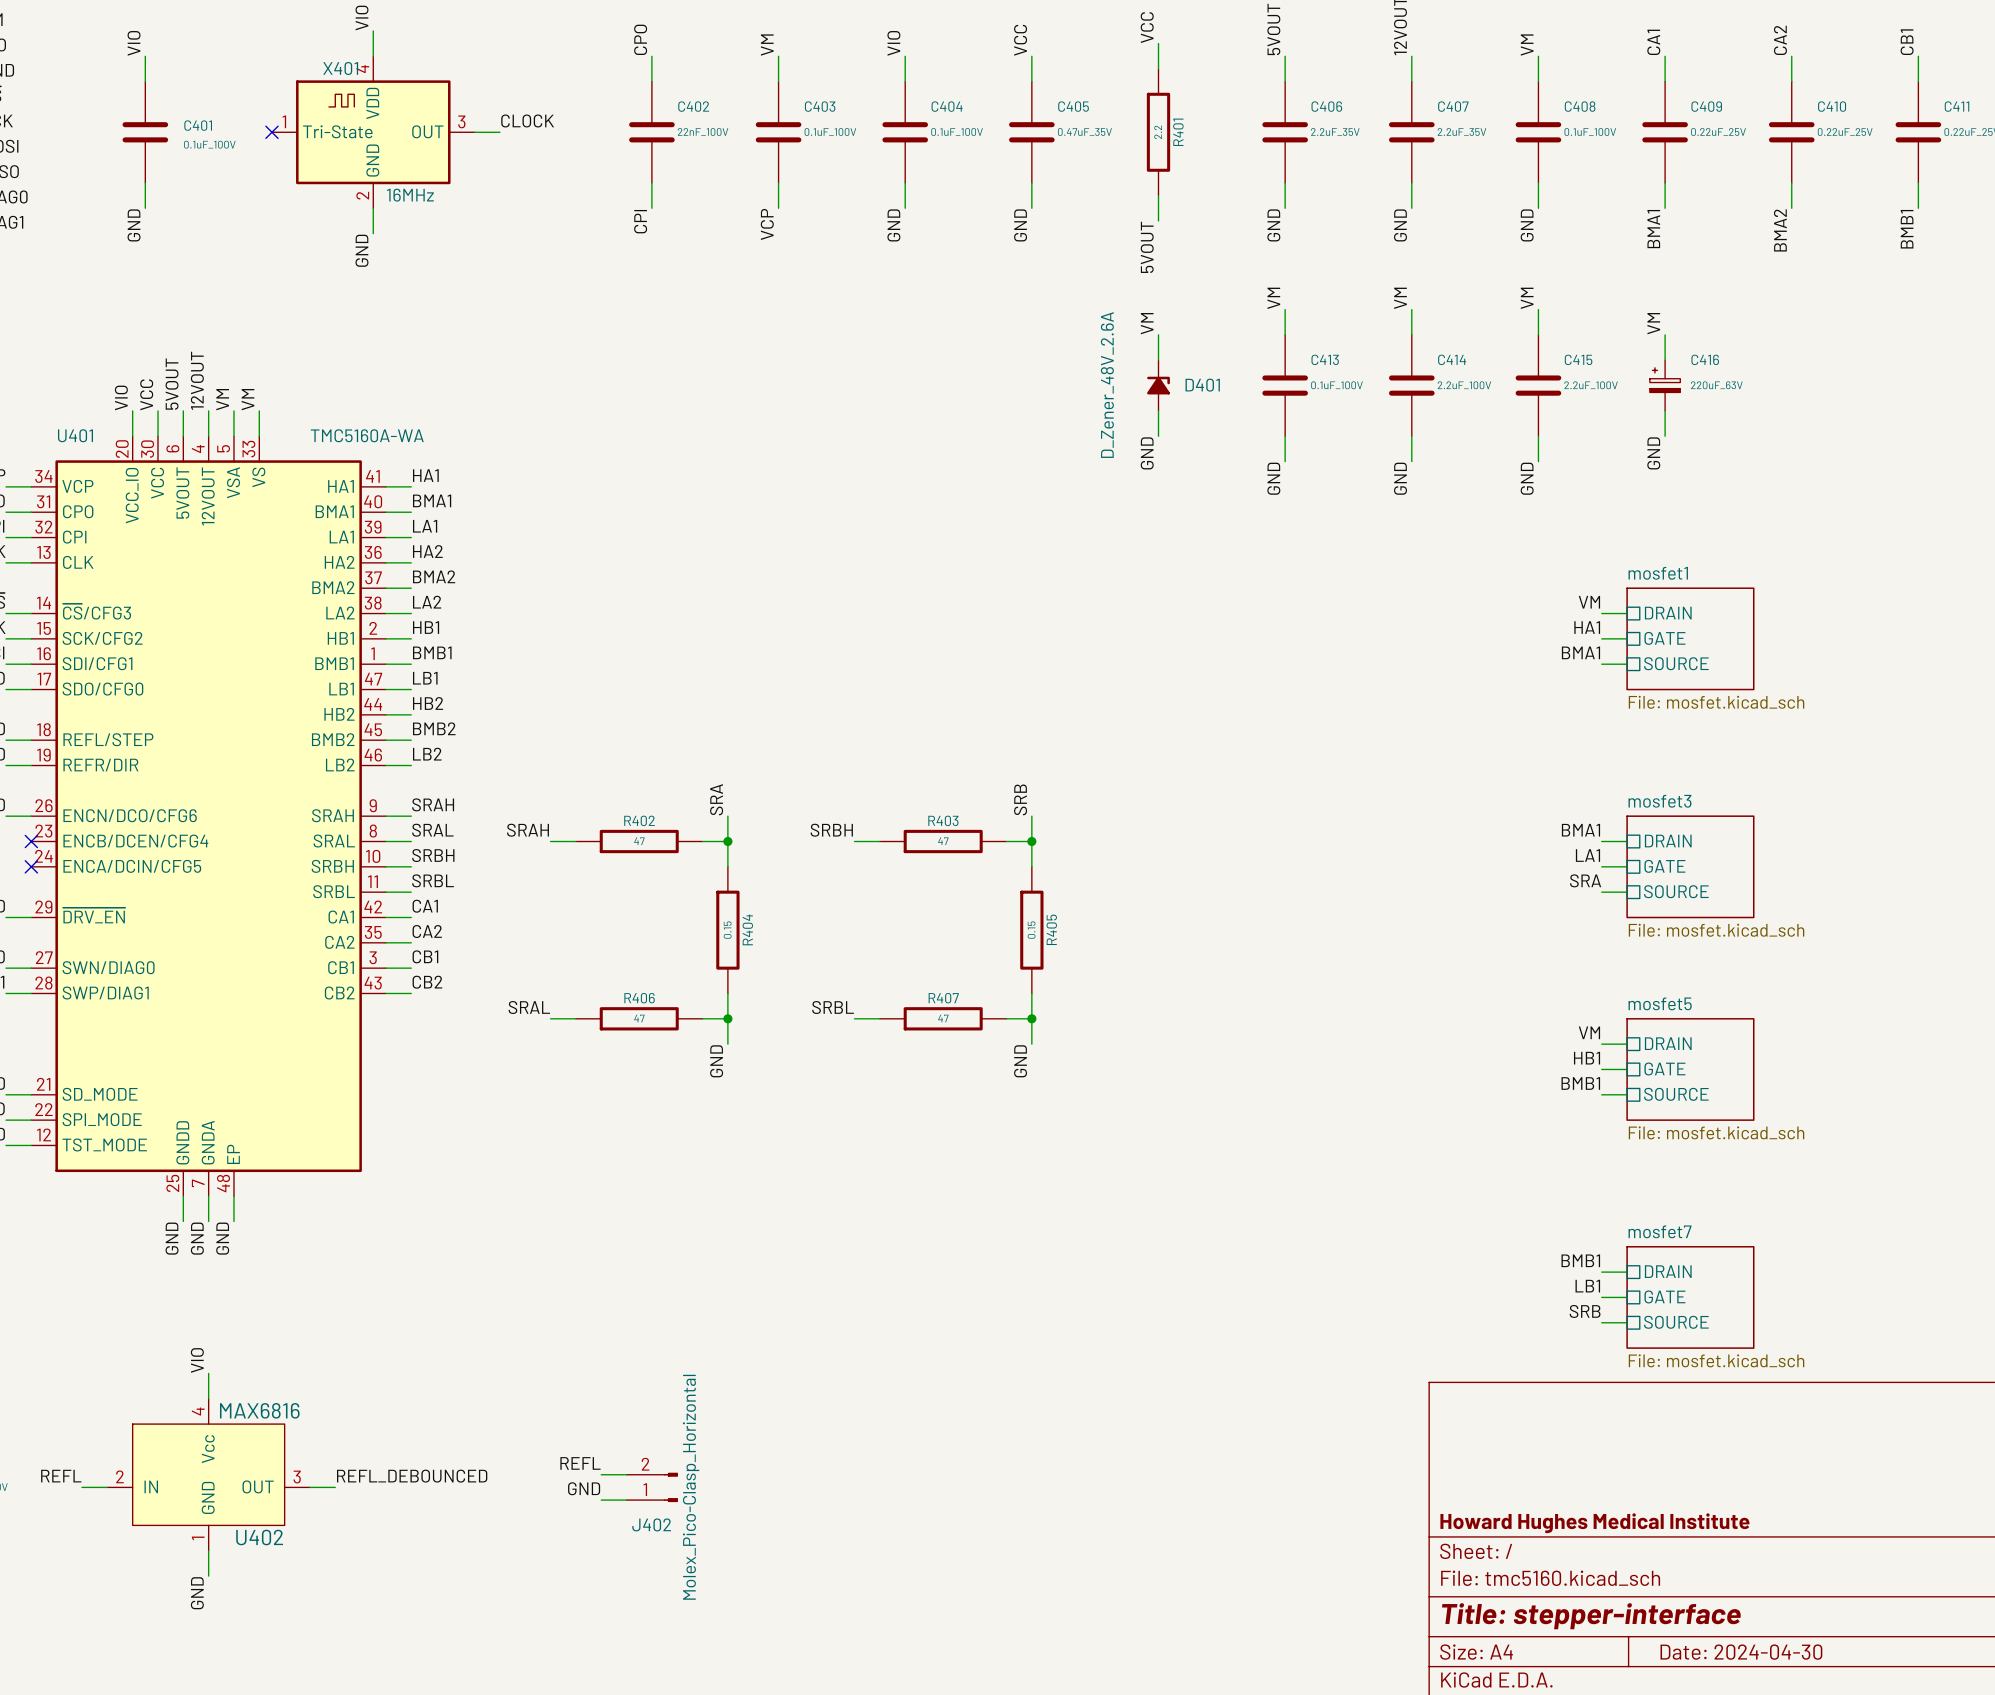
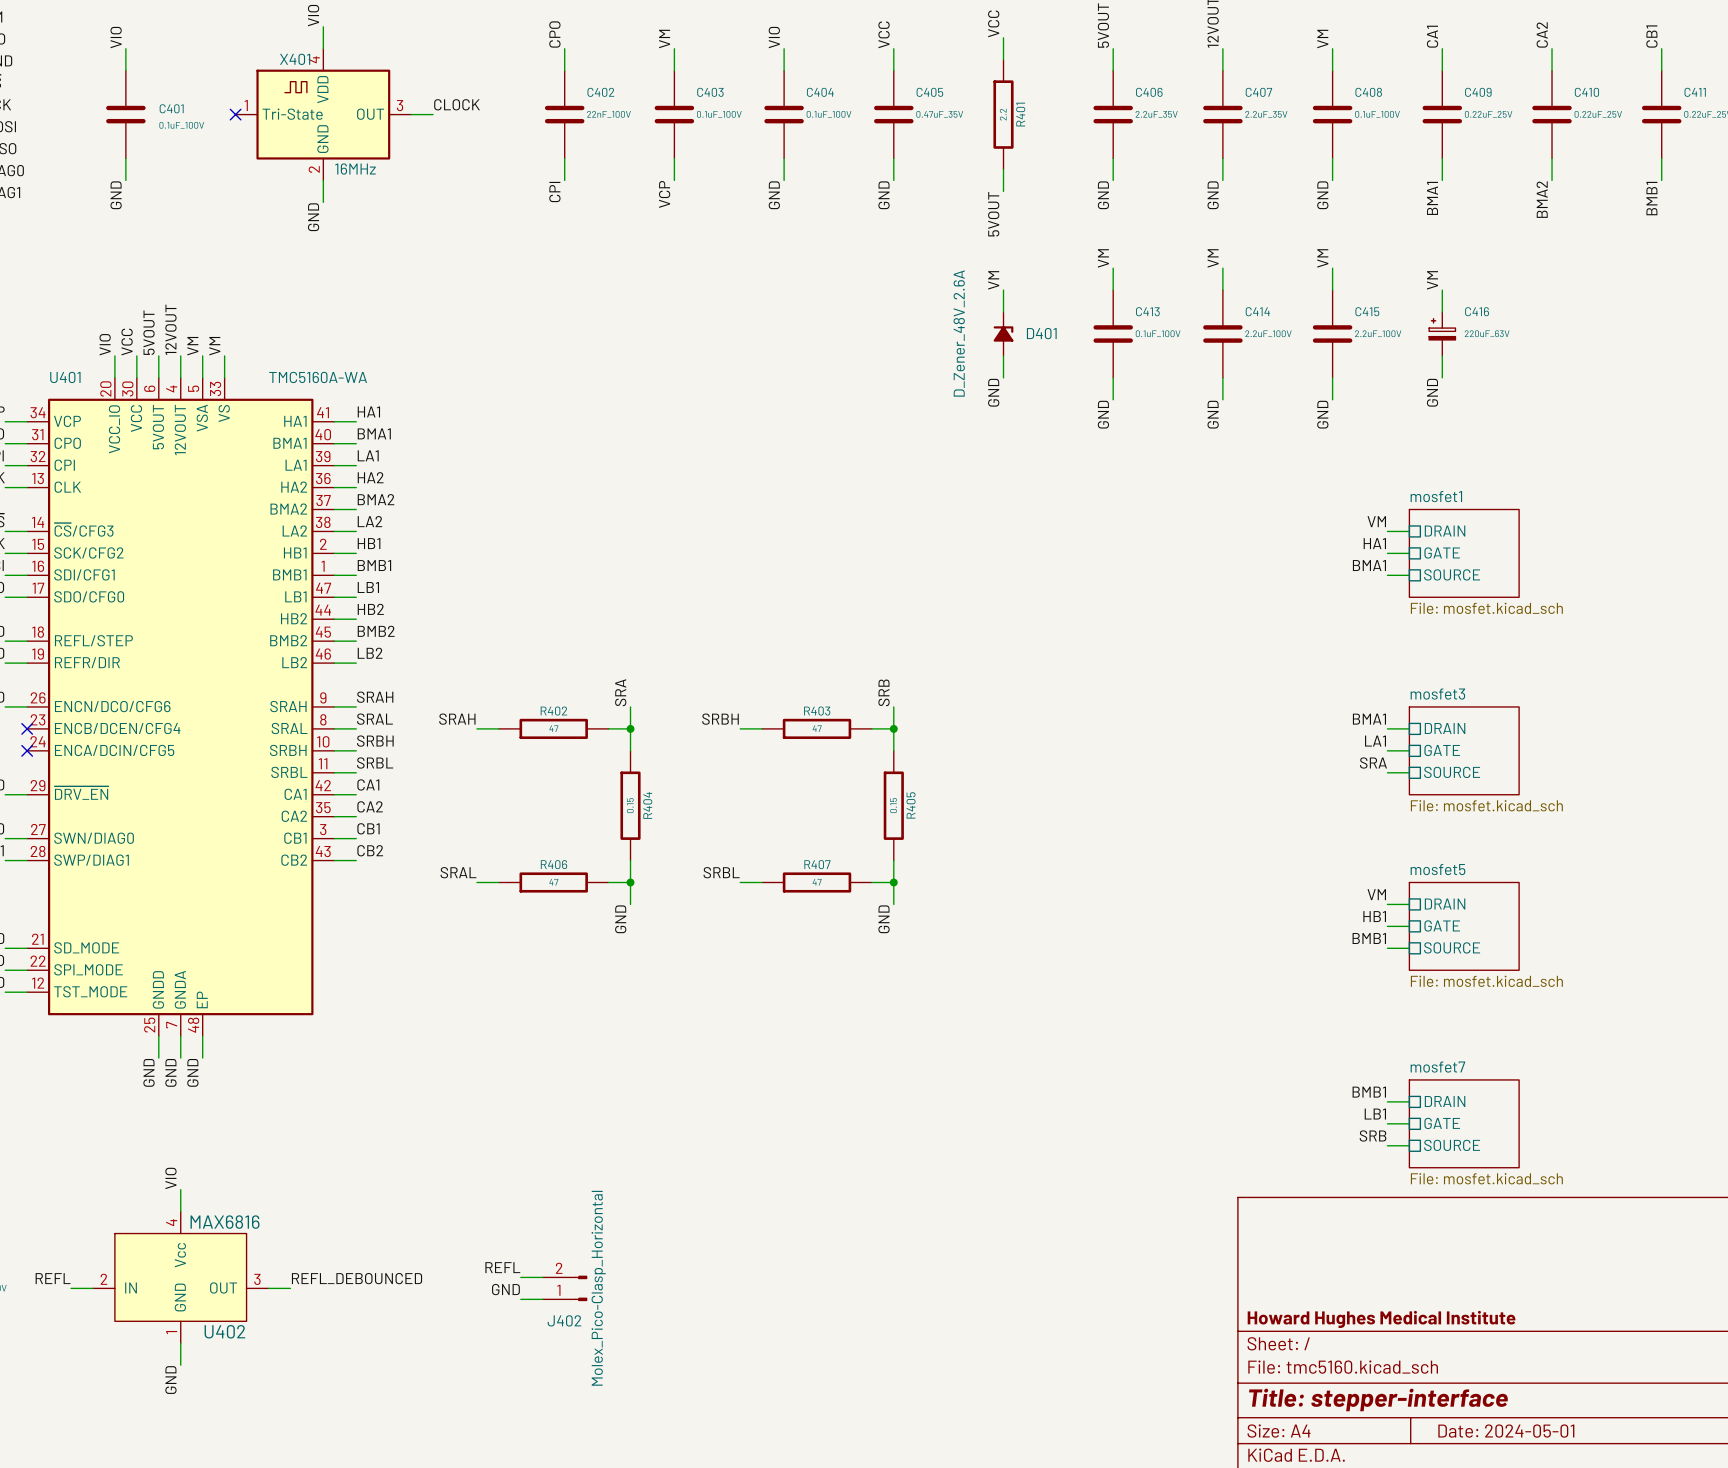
title block: Date: 2024-04-30 (1741, 1652) -> Date: 2024-05-01 (1506, 1431)

